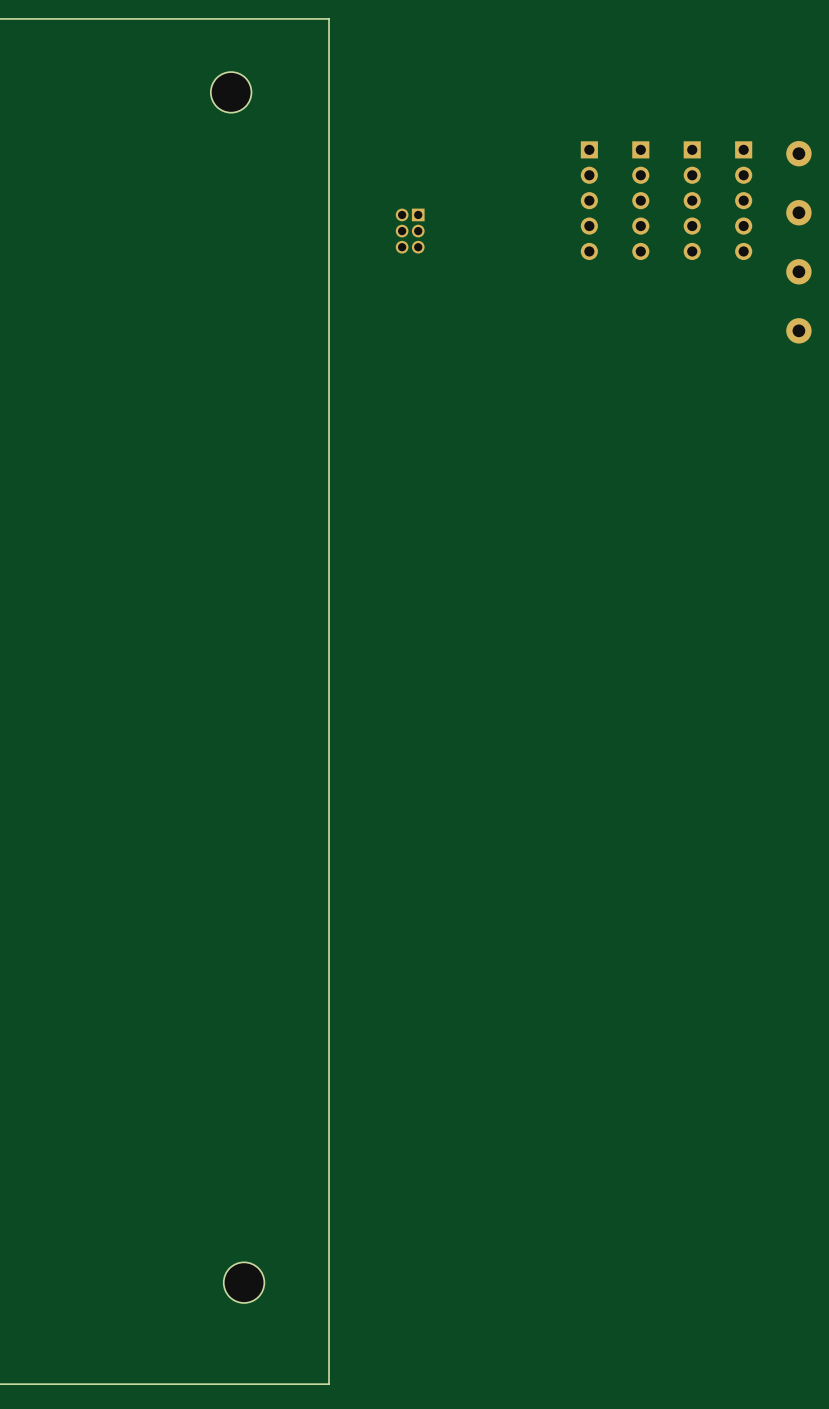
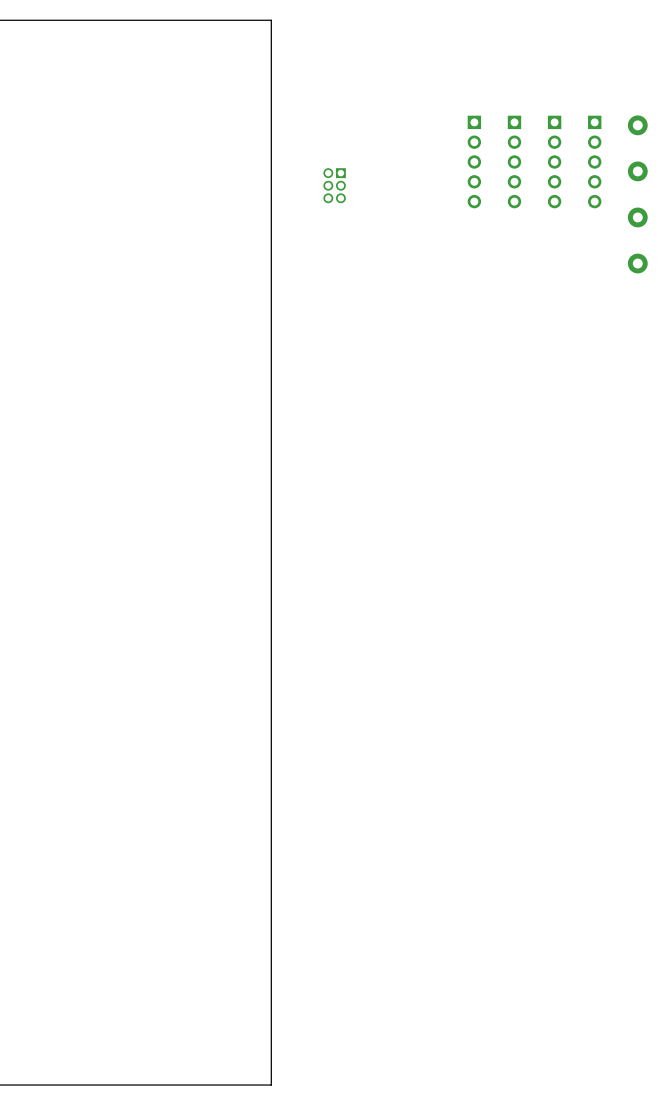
part: (231, 92) -> none
part: (244, 1282) -> none

